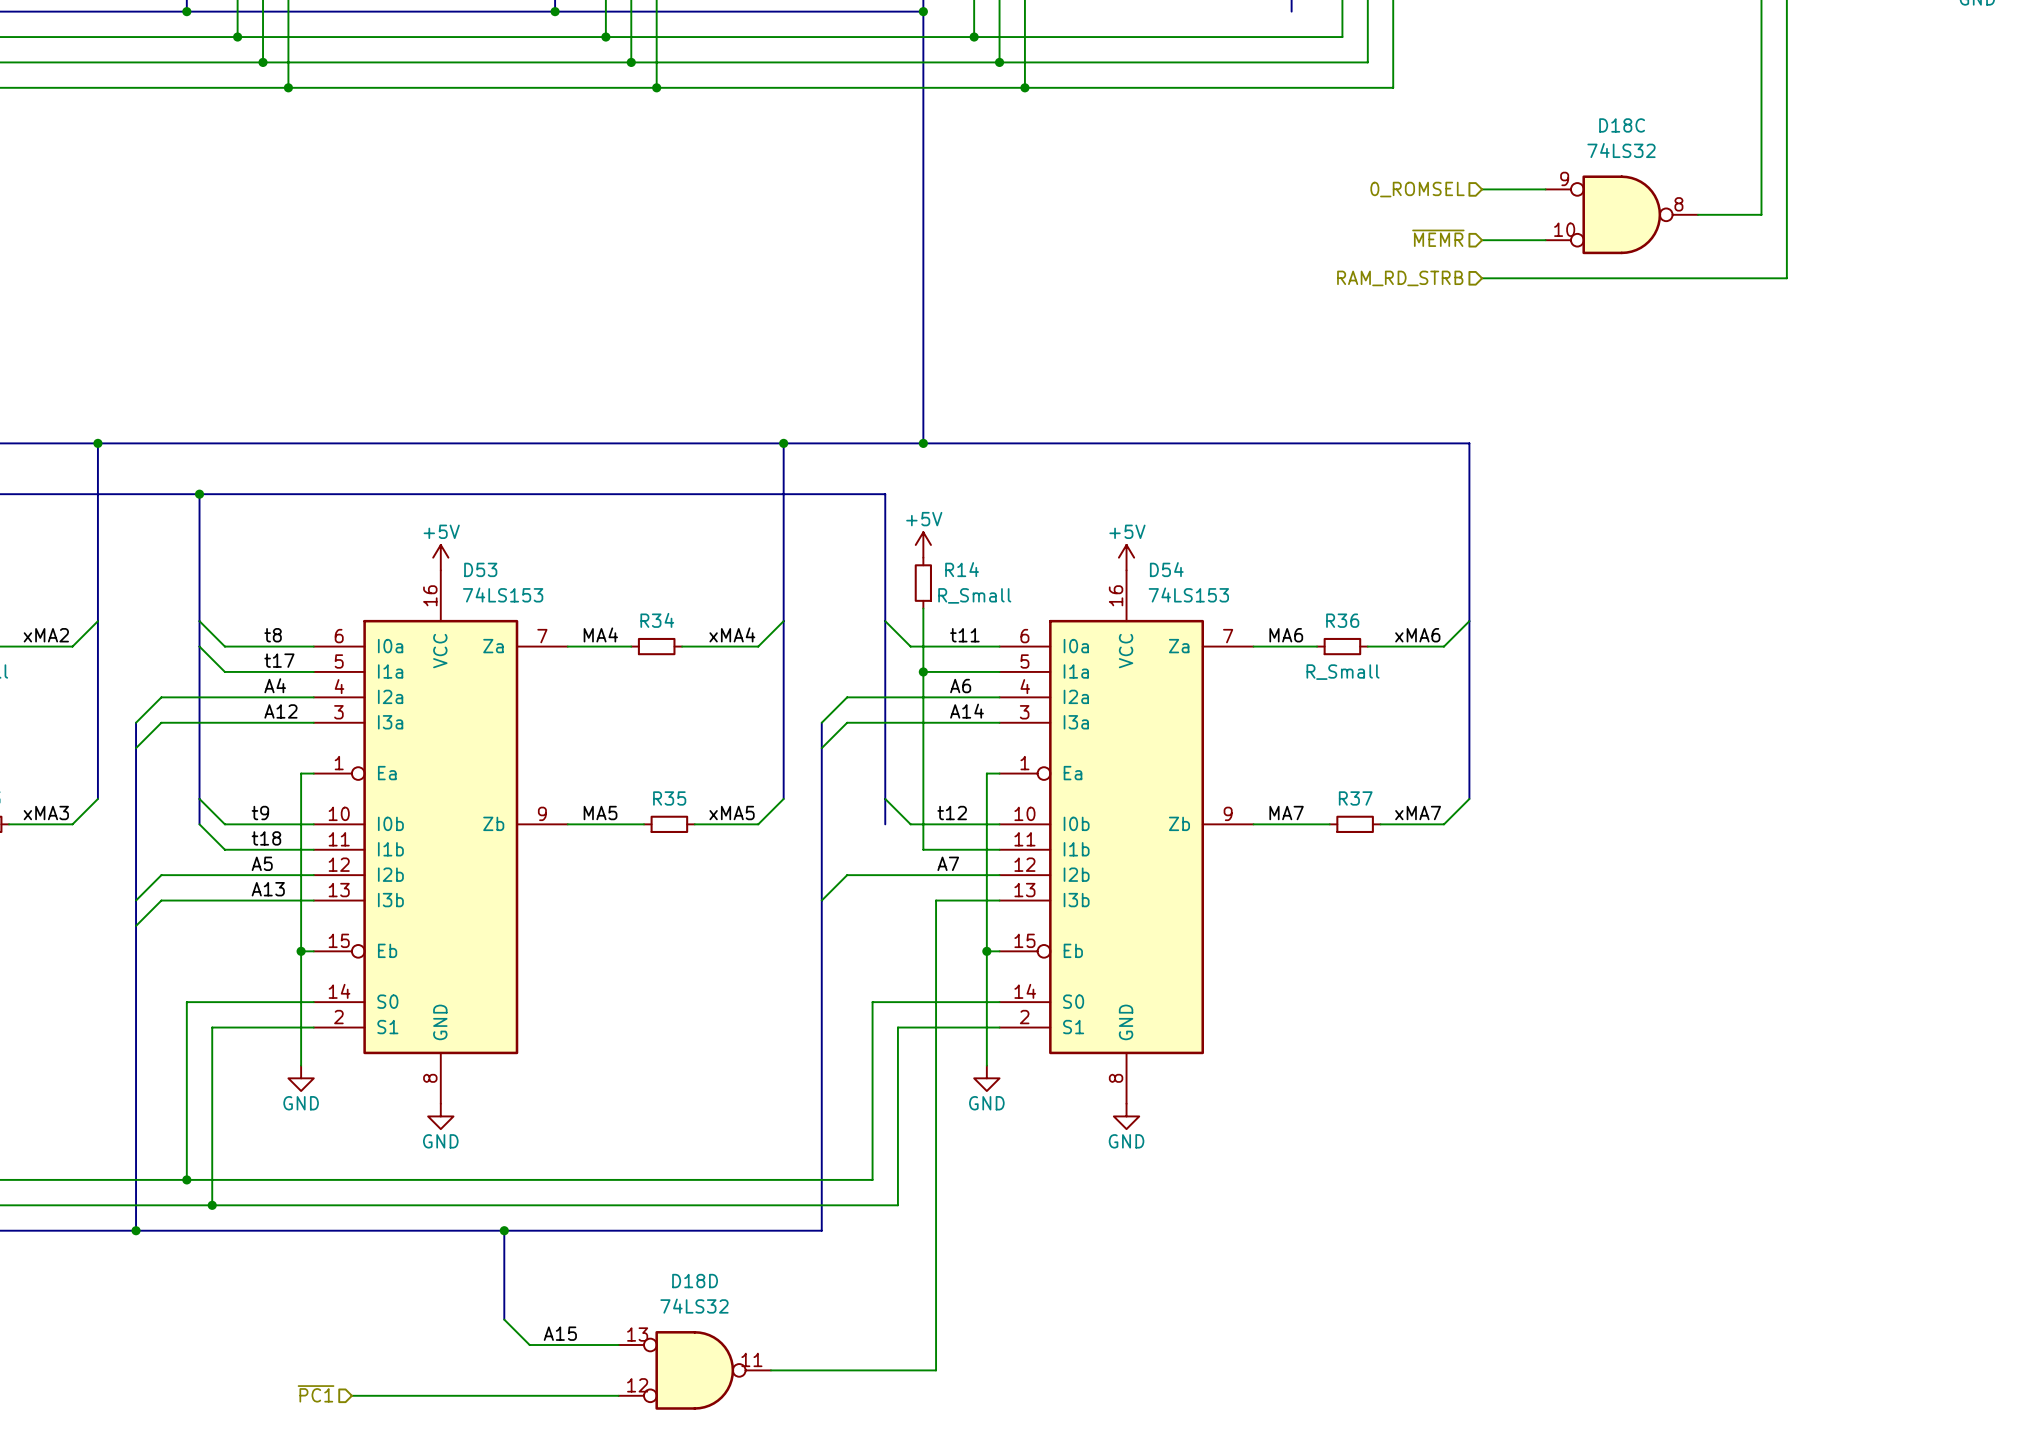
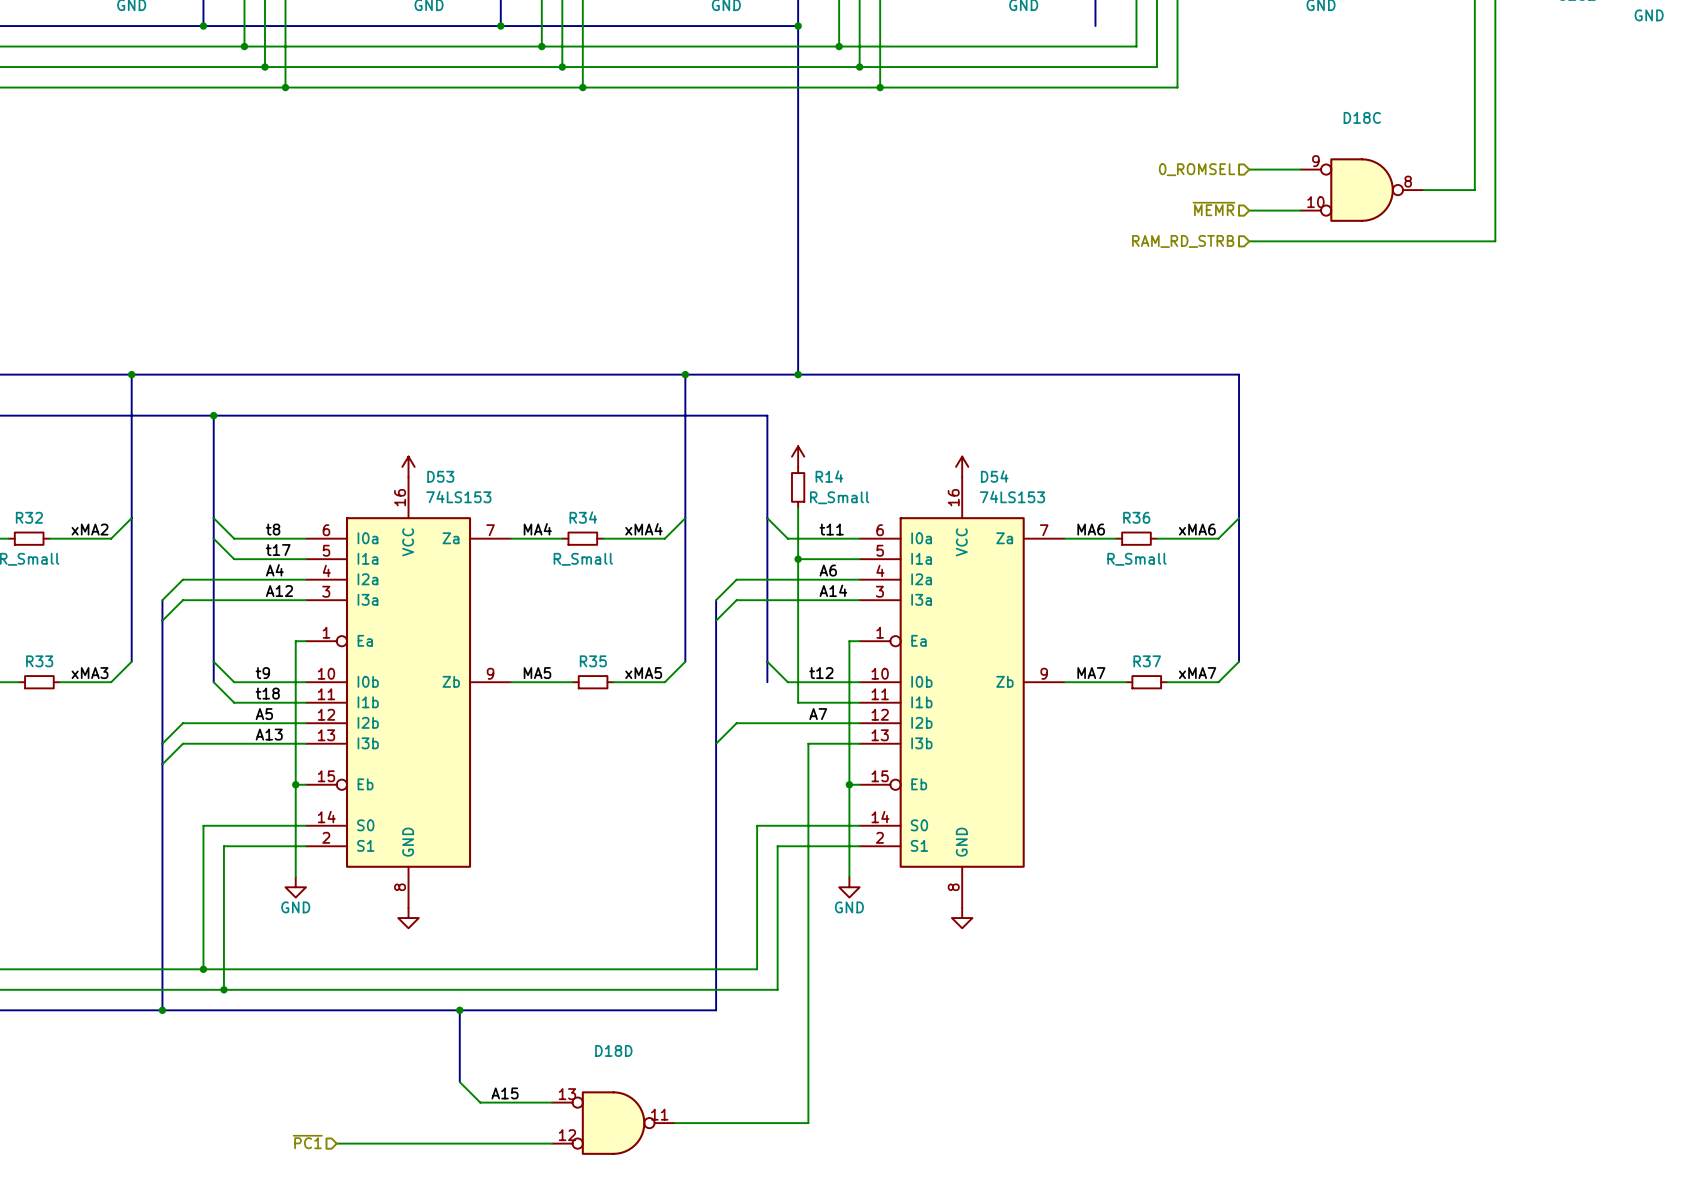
D18C value: 74LS32 (1621, 150) -> none
power symbol text: +5V (924, 519) -> none
power symbol text: +5V (441, 531) -> none
power symbol text: +5V (1127, 531) -> none
R34 value: none -> R_Small (583, 559)
power symbol text: GND (440, 1141) -> none
power symbol text: GND (1126, 1141) -> none
D18D value: 74LS32 (694, 1306) -> none

